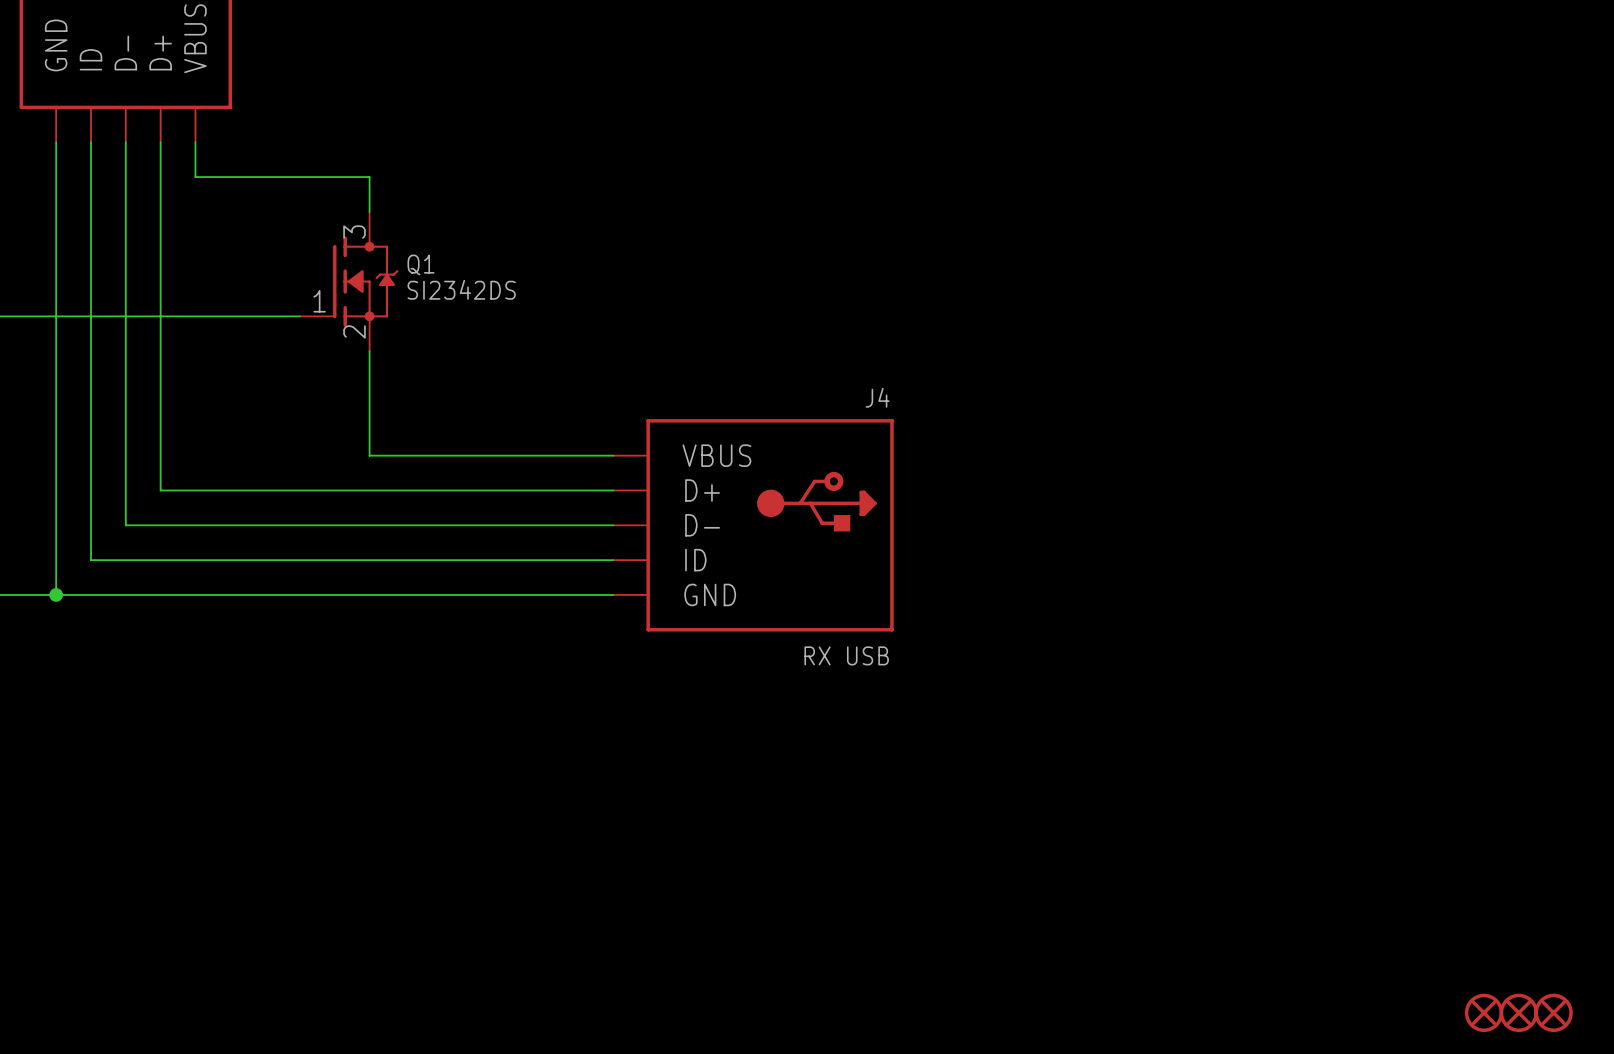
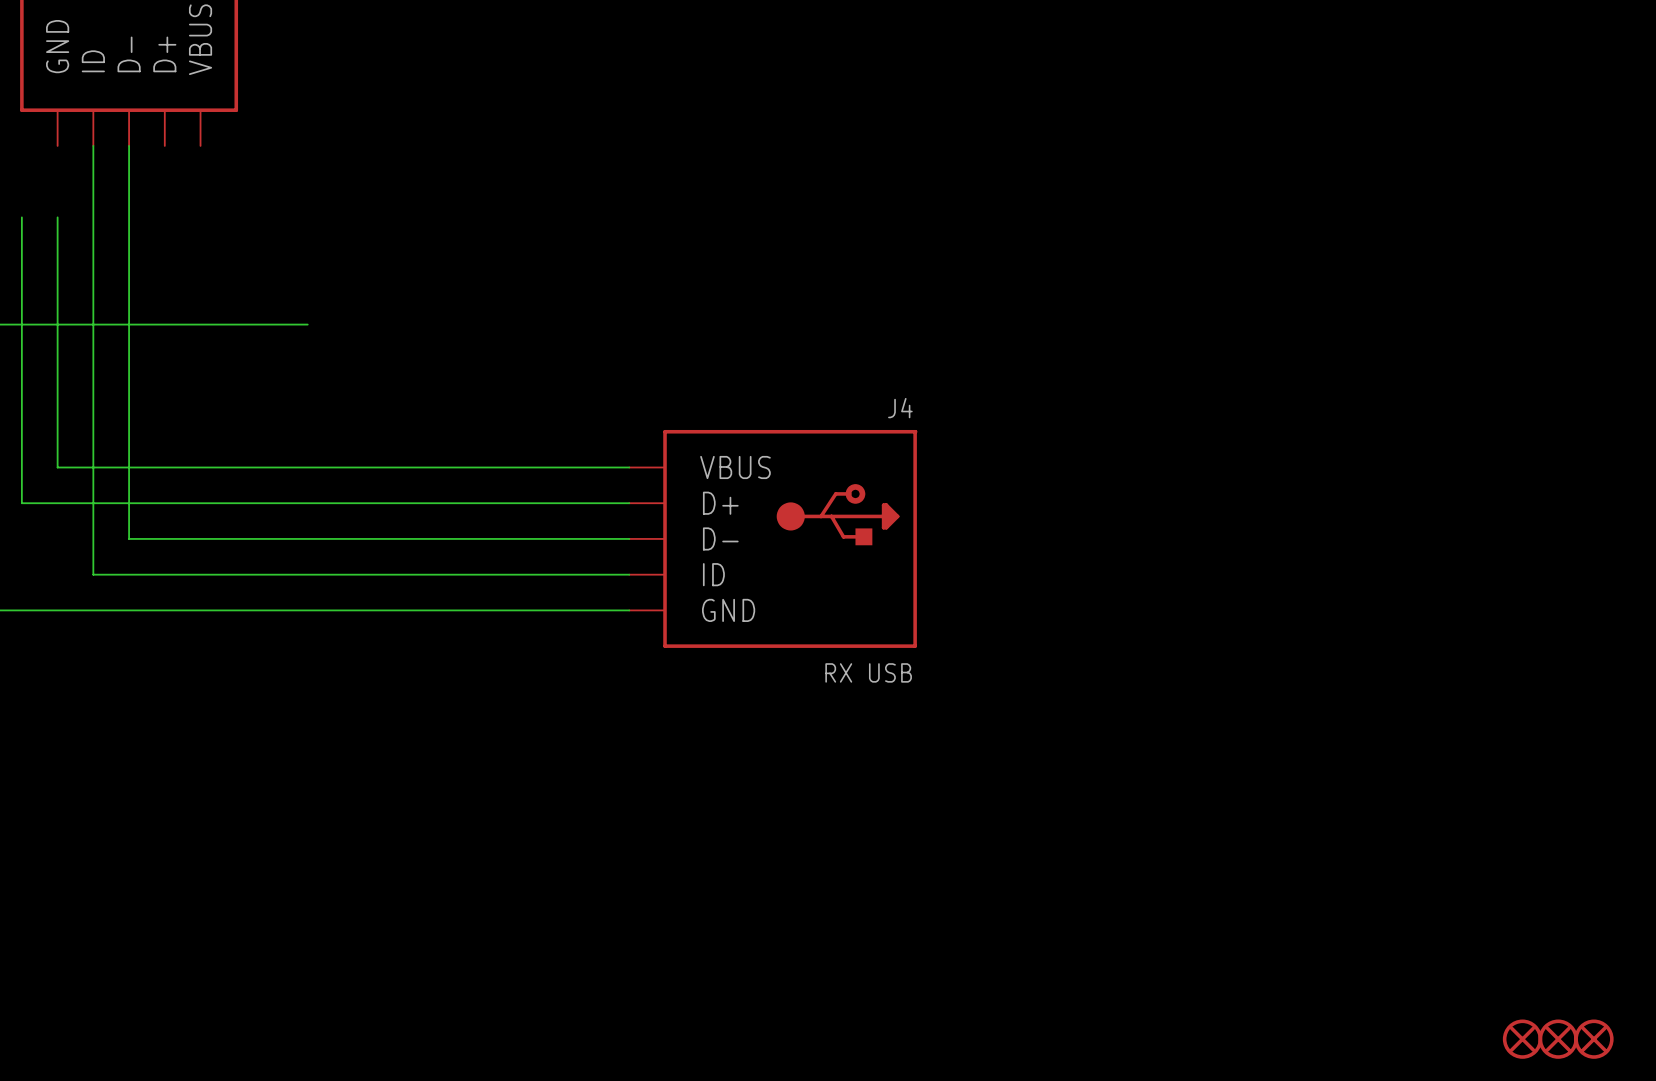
wire: (56, 142) (56, 211) -> none
wire: (160, 142) (160, 490) -> (21, 217) (21, 503) (164, 503)
wire: (195, 142) (195, 177) (369, 177) (369, 211) -> none
Q1: SI2342DS (349, 281) -> none
wire: (369, 351) (369, 455) -> (57, 467) (379, 467)
wire: (56, 455) (56, 594) -> none
junction: (56, 594) -> none

